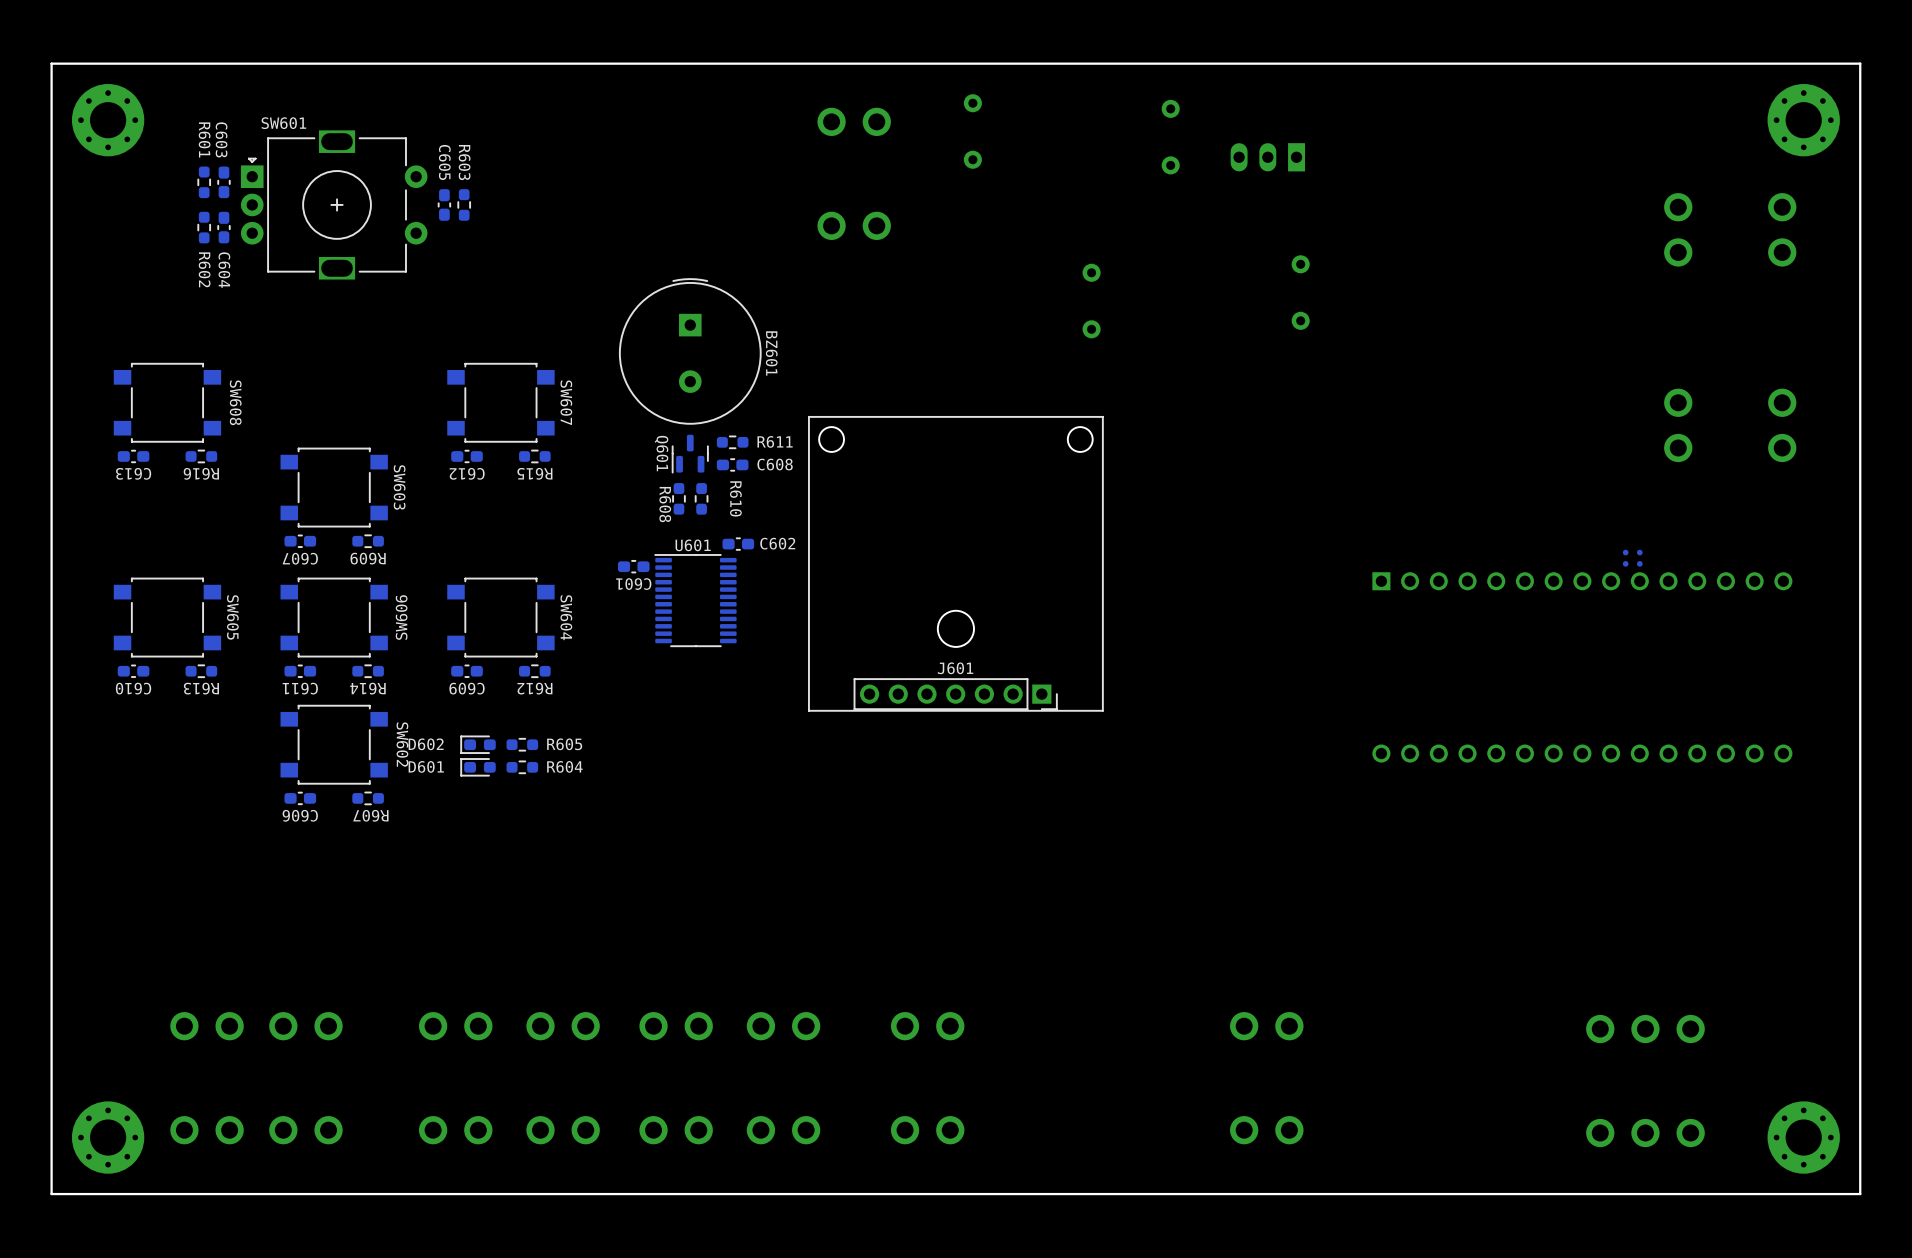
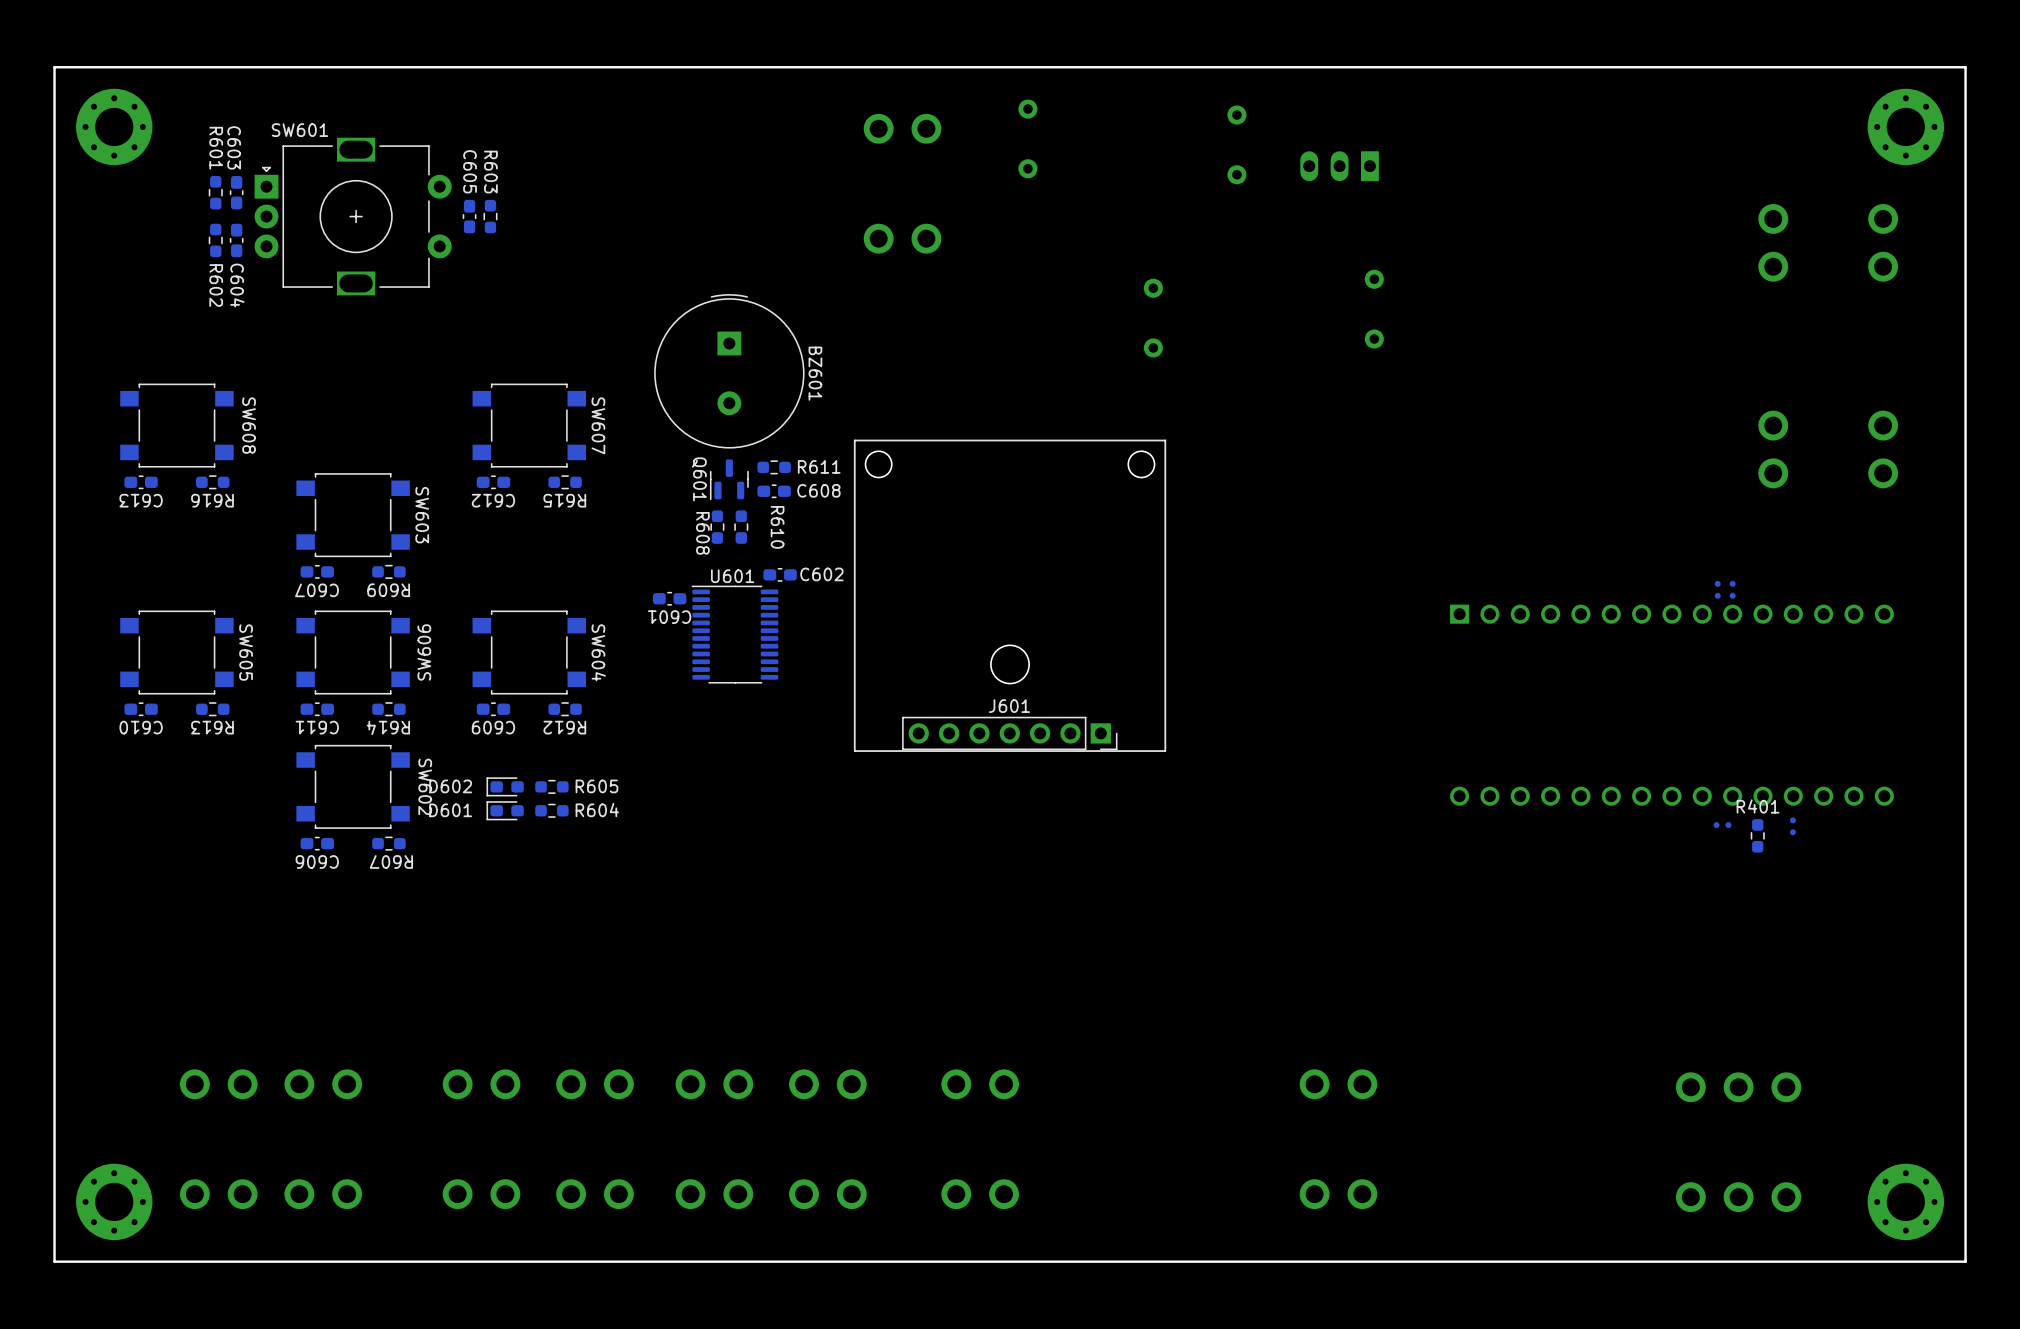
part: none -> (1722, 825)
part: none -> (1792, 826)
R401: none -> (1757, 835)

